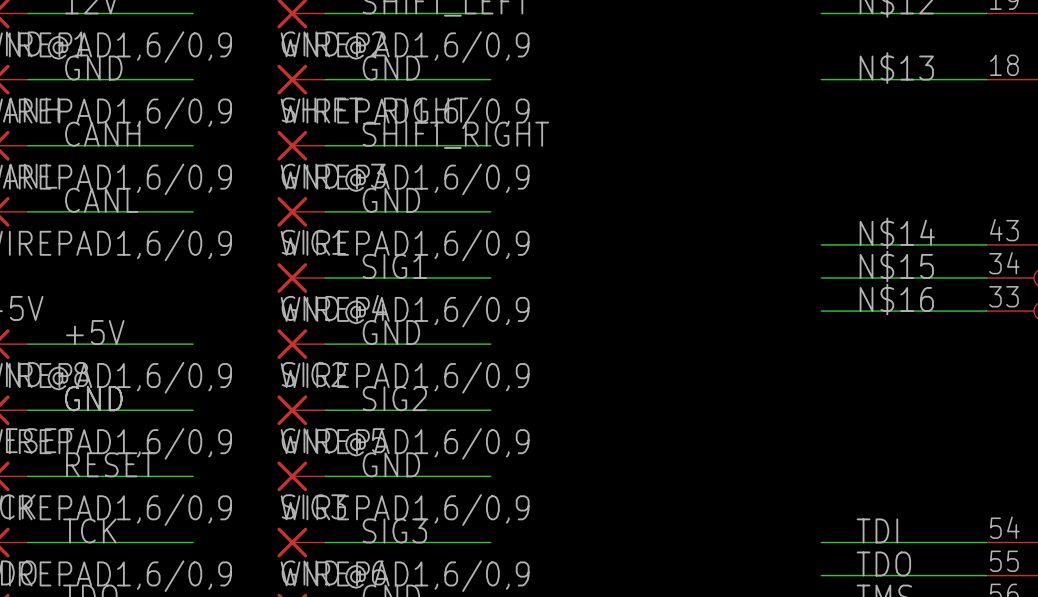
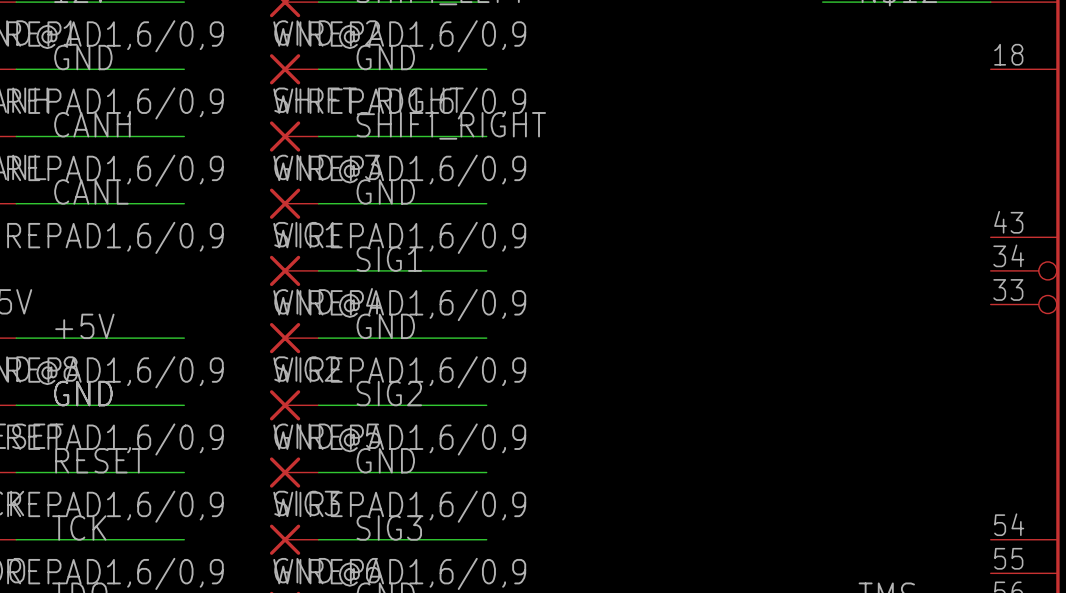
label: N$13 (896, 68) -> none
wire: (821, 79) (986, 79) -> none
label: N$14 (897, 233) -> none
wire: (821, 244) (986, 244) -> none
label: N$15 (896, 266) -> none
wire: (821, 278) (986, 278) -> none
label: N$16 (896, 299) -> none
wire: (821, 311) (986, 311) -> none
label: TDI (877, 530) -> none
wire: (821, 542) (986, 542) -> none
label: TDO (883, 564) -> none
wire: (821, 575) (986, 575) -> none

